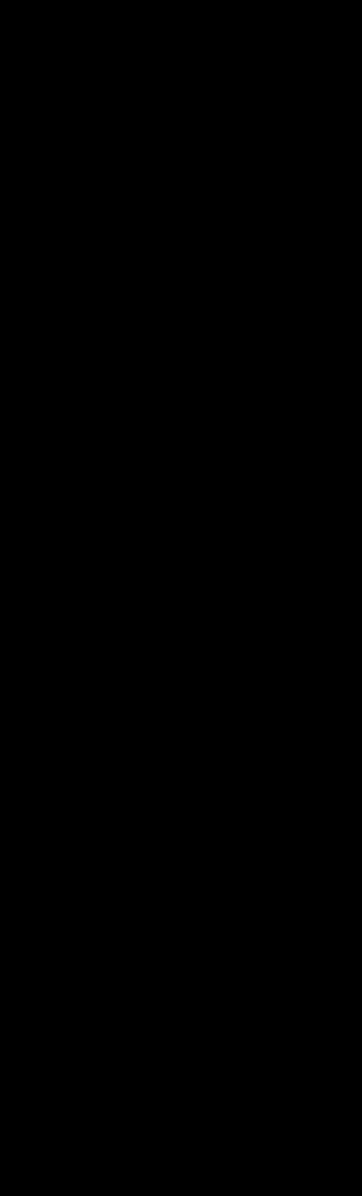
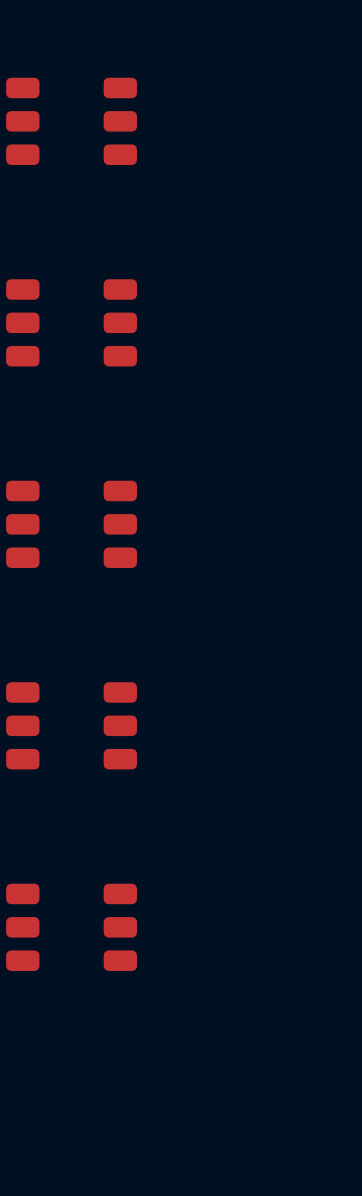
part: none -> (71, 121)
part: none -> (71, 322)
part: none -> (71, 524)
part: none -> (71, 725)
part: none -> (71, 927)

